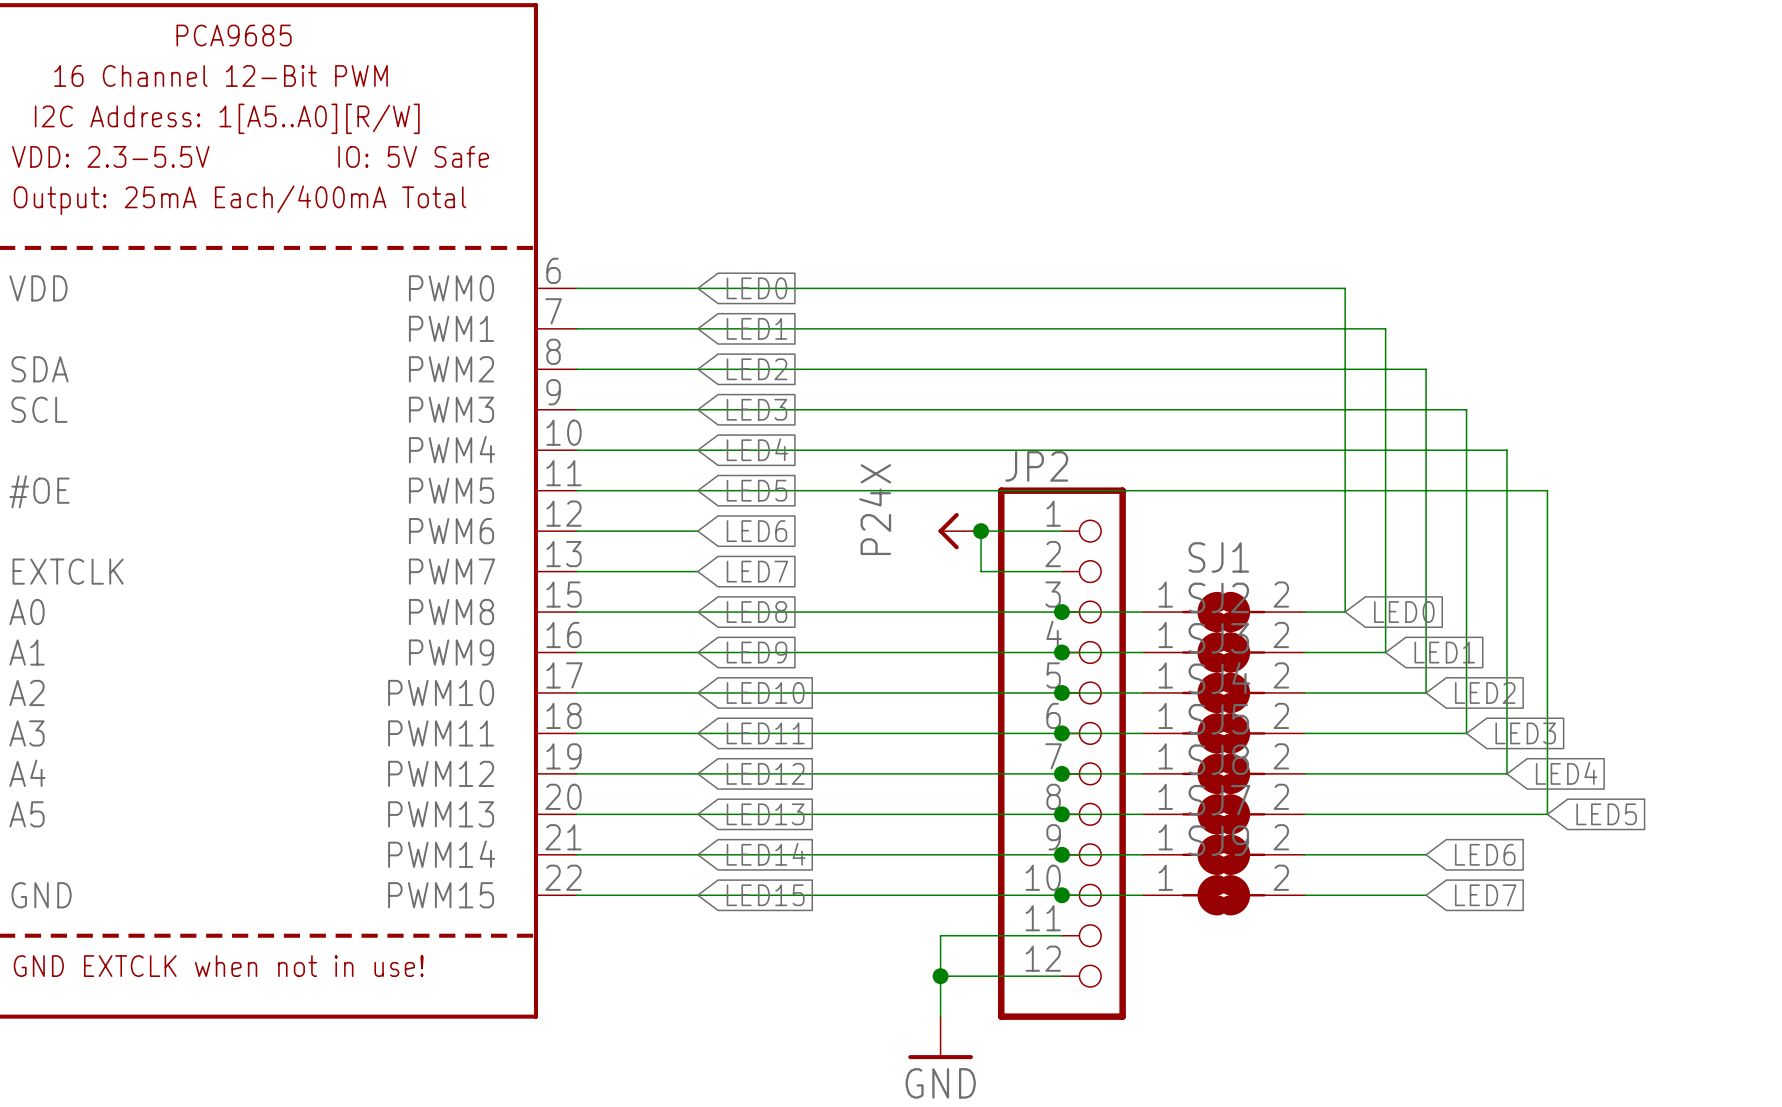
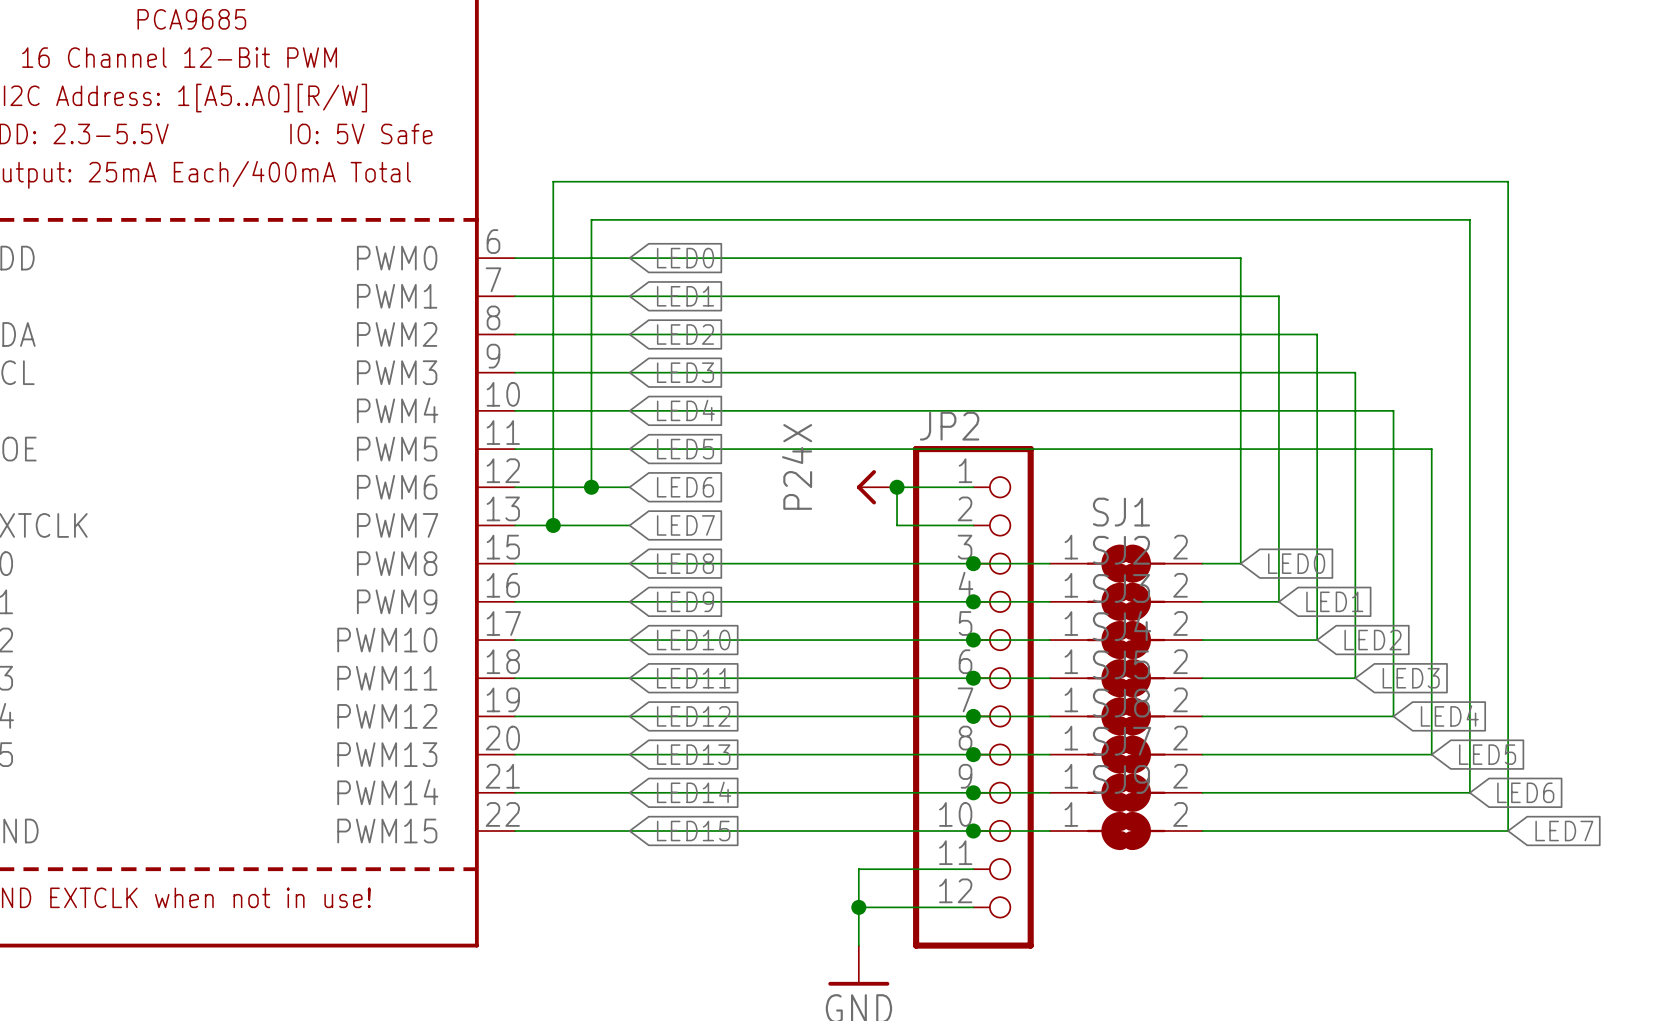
wire: none -> (591, 487) (591, 219) (1469, 219) (1469, 792) (1317, 792)
junction: none -> (591, 487)
wire: none -> (553, 525) (553, 181) (1508, 181) (1508, 831) (1317, 831)
junction: none -> (553, 525)
global label position: LED6 (1485, 854) -> LED6 (1525, 792)
global label position: LED7 (1485, 895) -> LED7 (1564, 831)

